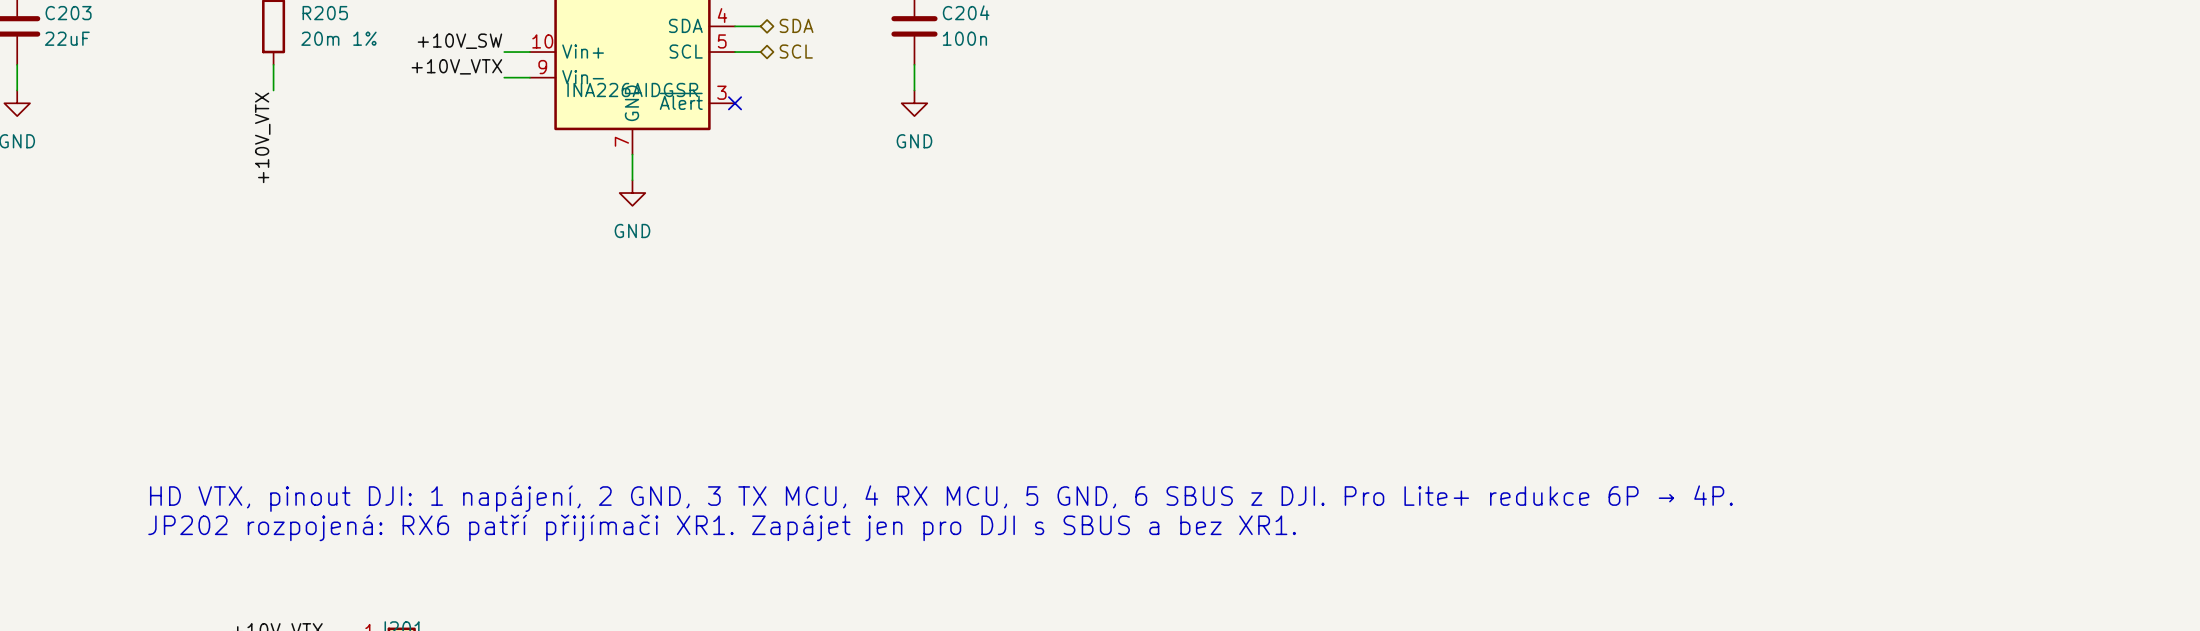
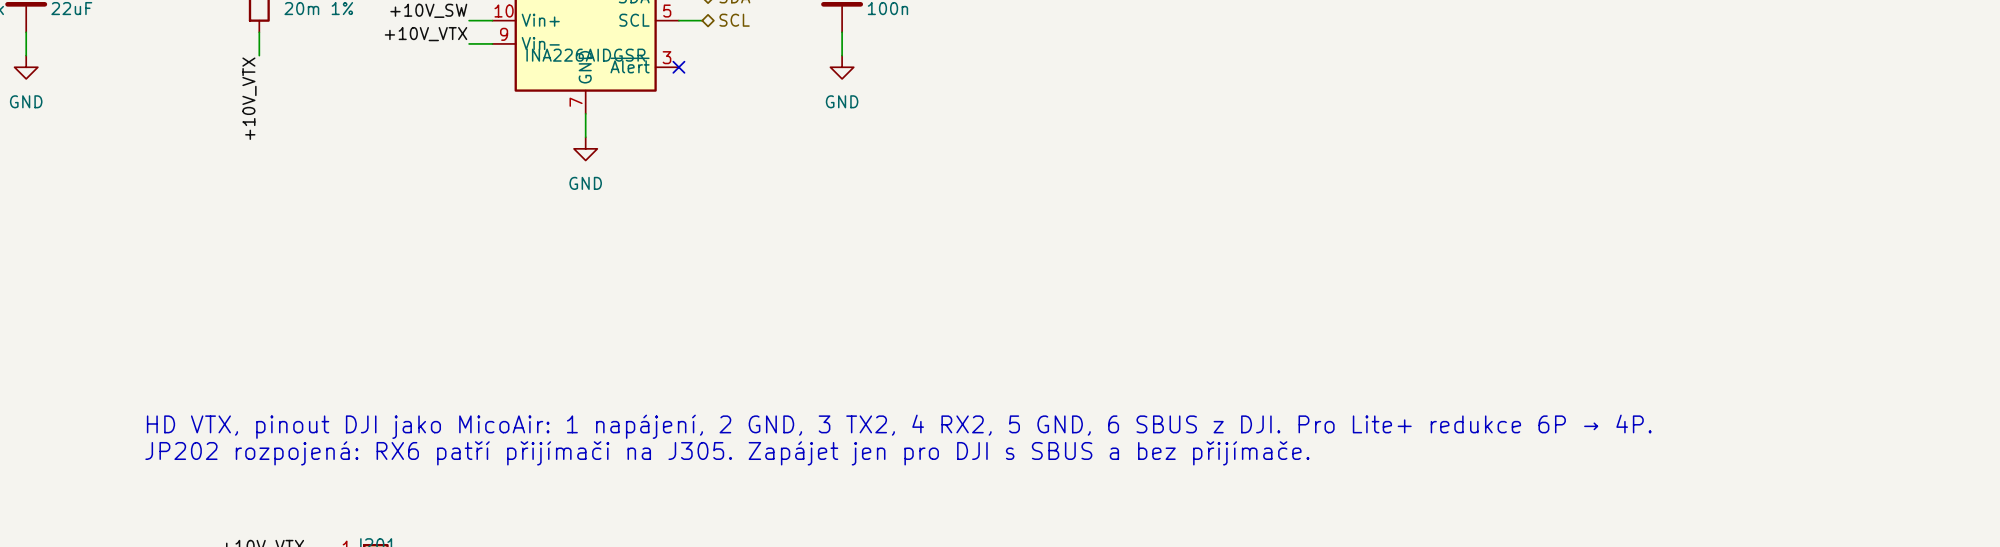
text: HD VTX, pinout DJI: 1 napájení, 2 GND, 3 TX MCU, 4 RX MCU, 5 GND, 6 SBUS z DJI. Pro Lite+ redukce 6P → 4P. (941, 498) -> HD VTX, pinout DJI jako MicoAir: 1 napájení, 2 GND, 3 TX2, 4 RX2, 5 GND, 6 SBUS z DJI. Pro Lite+ redukce 6P → 4P. (899, 426)
text: JP202 rozpojená: RX6 patří přijímači XR1. Zapájet jen pro DJI s SBUS a bez XR1. (722, 527) -> JP202 rozpojená: RX6 patří přijímači na J305. Zapájet jen pro DJI s SBUS a bez přijímače. (727, 453)

